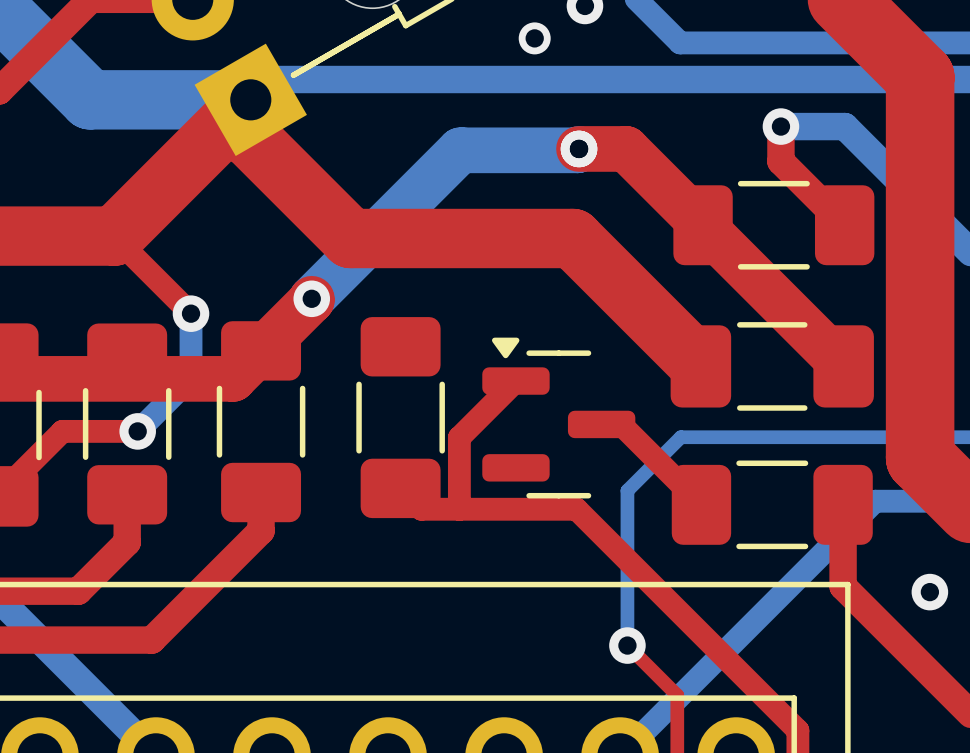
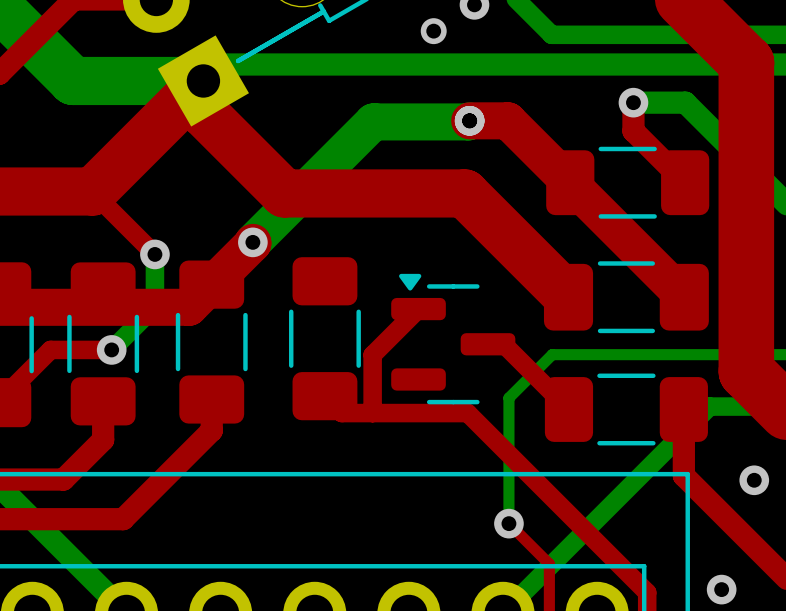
via: none -> (721, 589)

